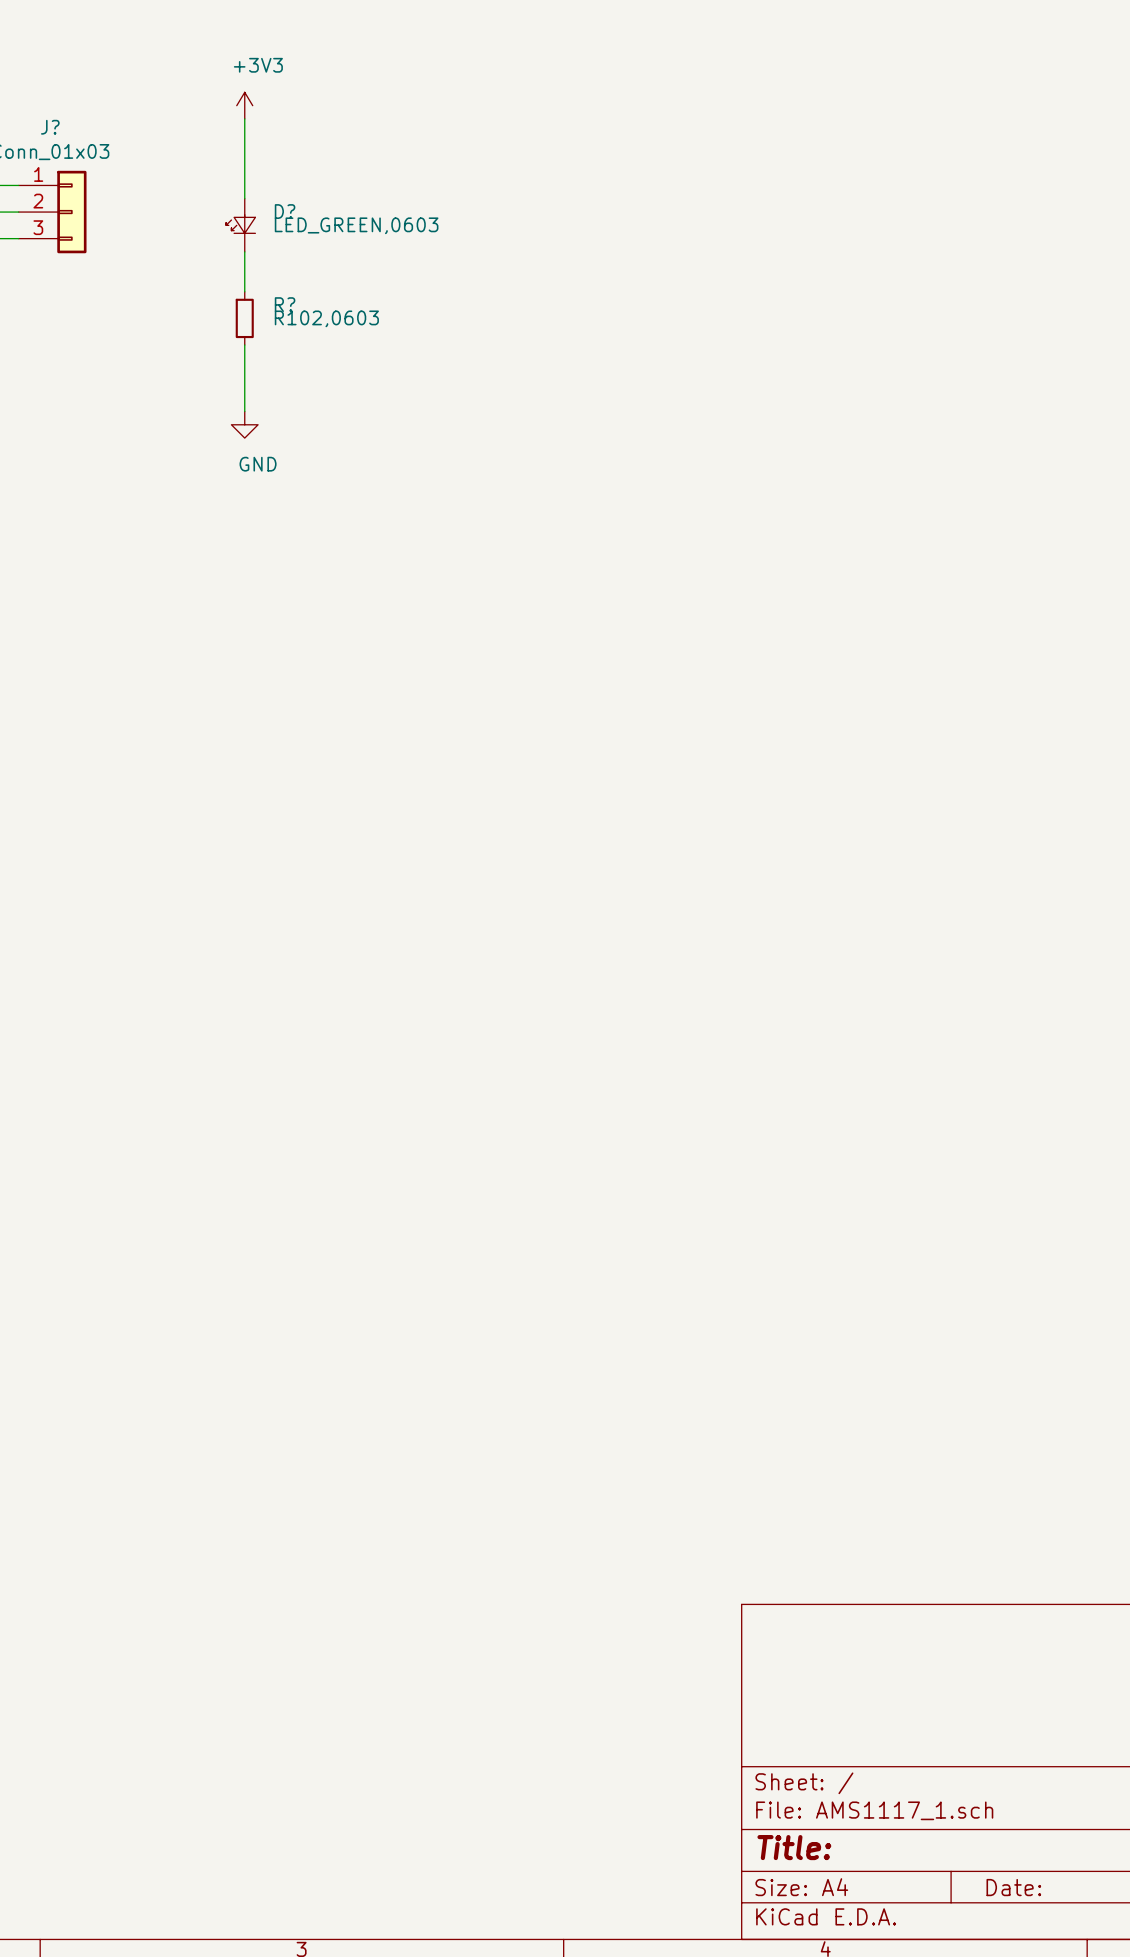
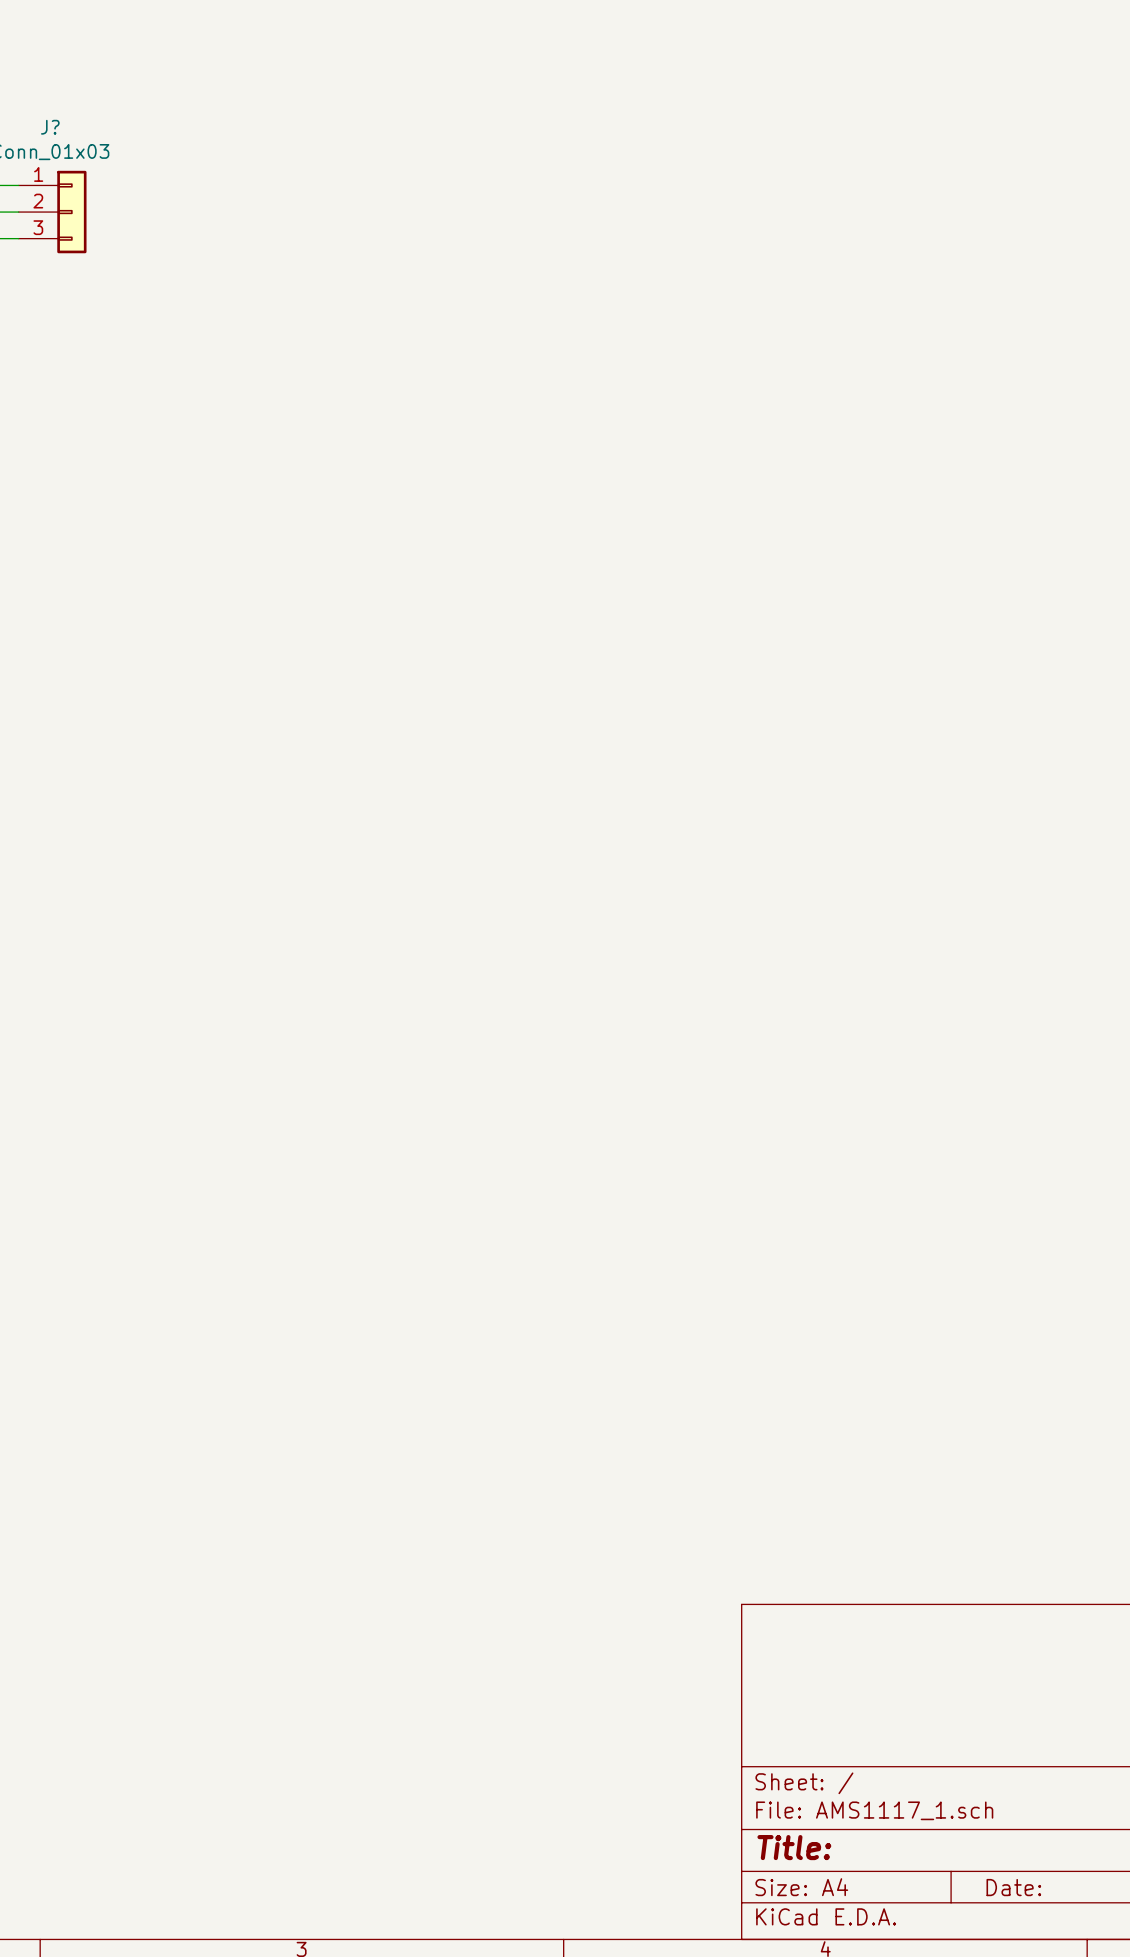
power symbol: +3V3 (244, 105) -> none
wire: (244, 118) (244, 198) -> none
D?: LED_GREEN,0603 (240, 225) -> none
wire: (244, 251) (244, 291) -> none
R?: R102,0603 (244, 318) -> none
wire: (244, 345) (244, 411) -> none
power symbol: GND (244, 424) -> none

